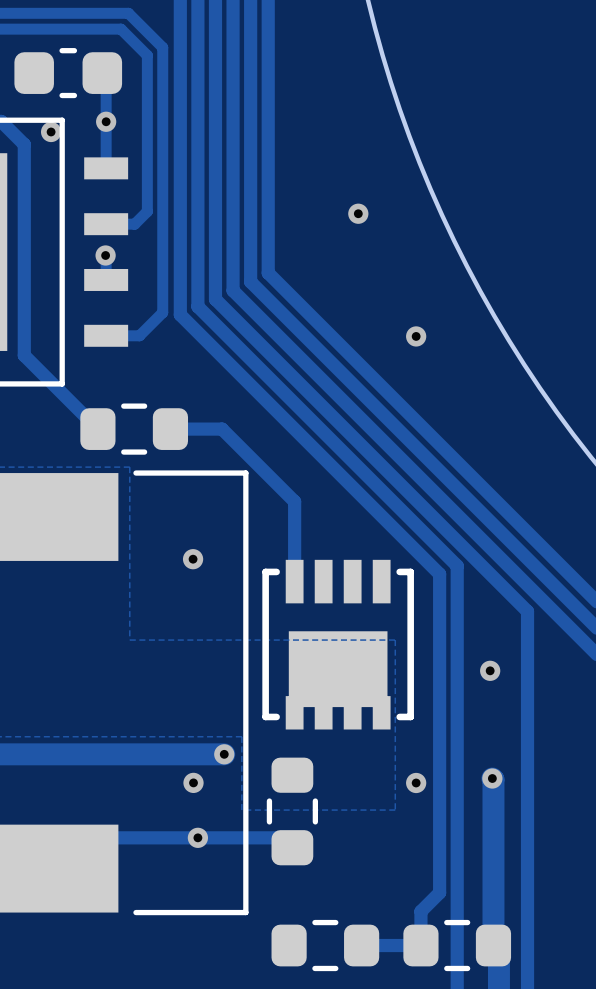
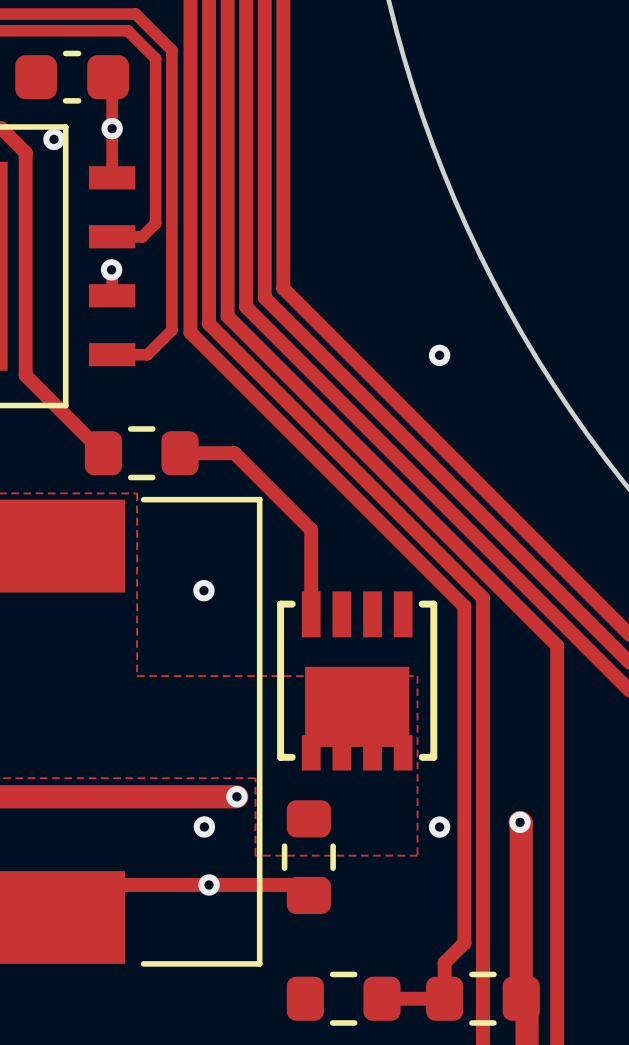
via: (358, 213) -> none
via: (490, 670) -> none

